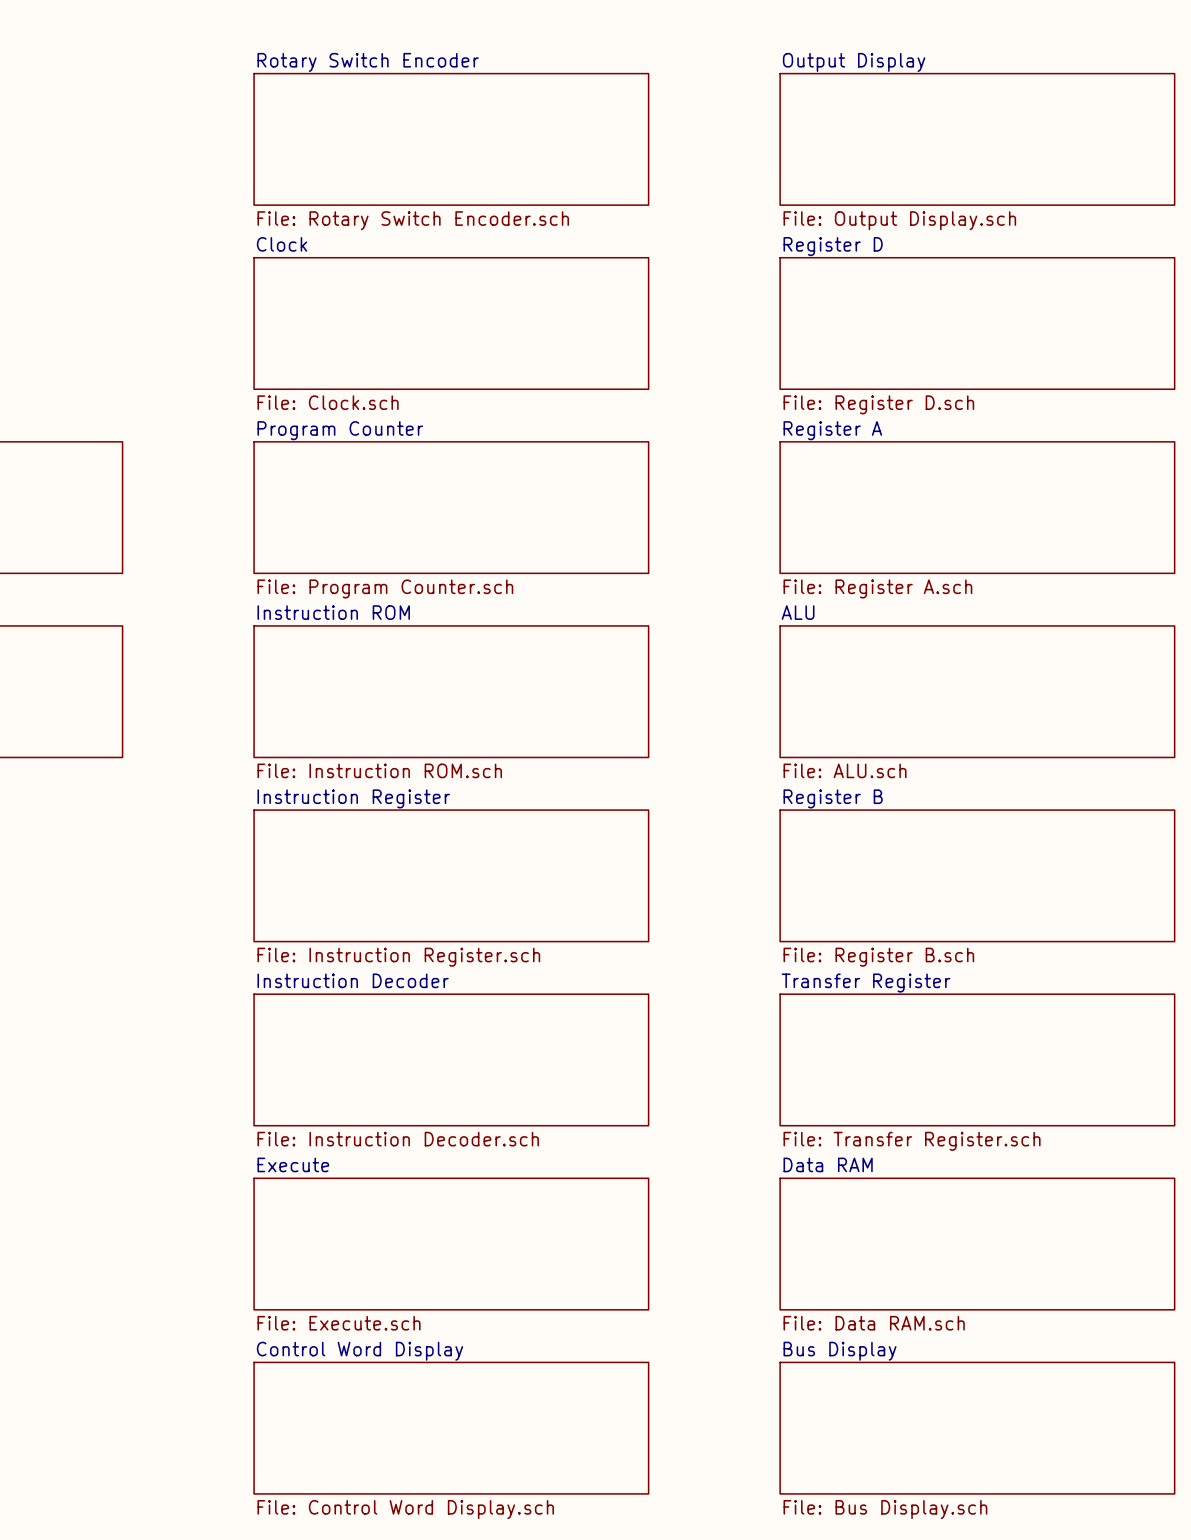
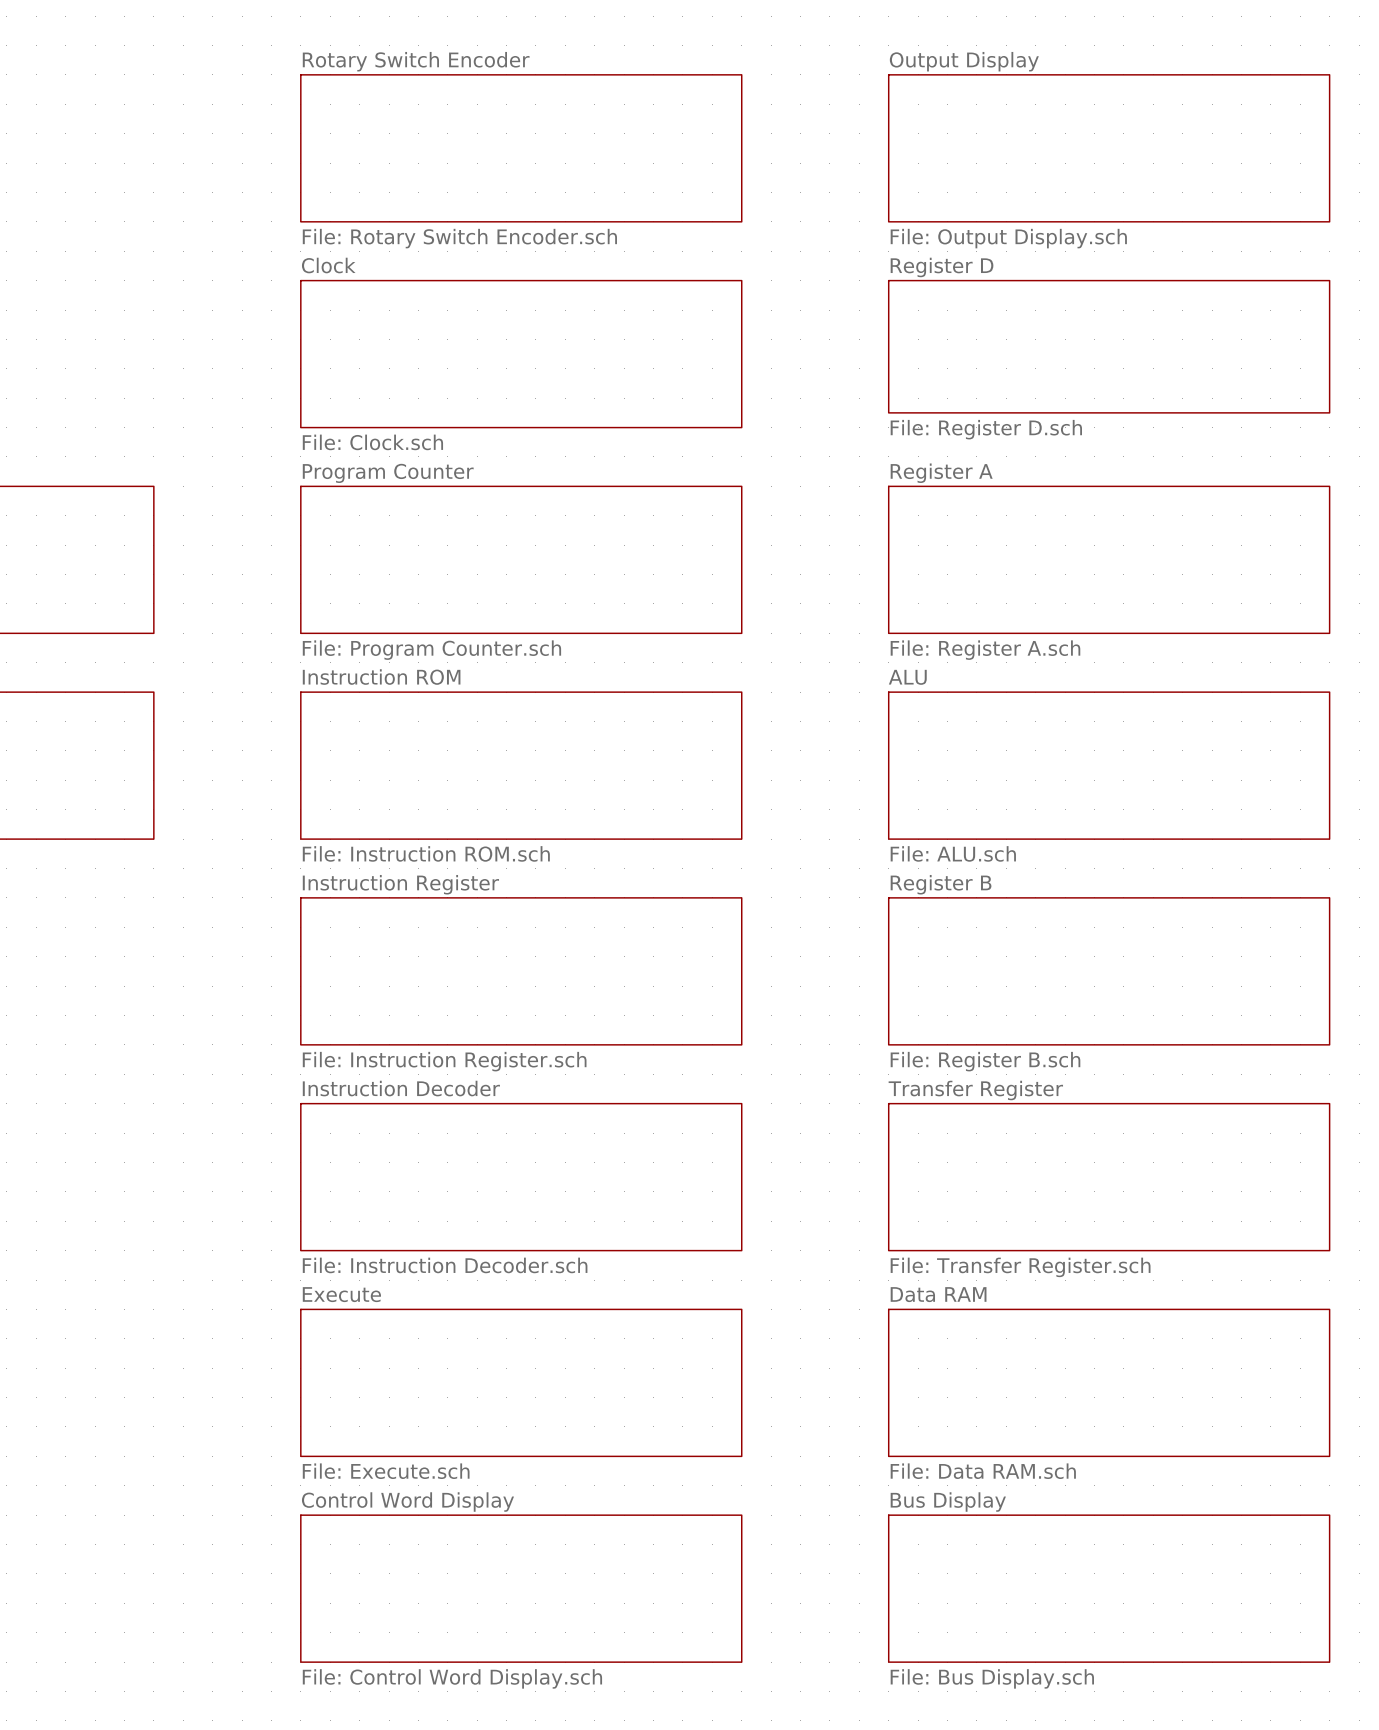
sheet Register D shape: [780, 257, 1175, 390] -> [888, 280, 1330, 413]

